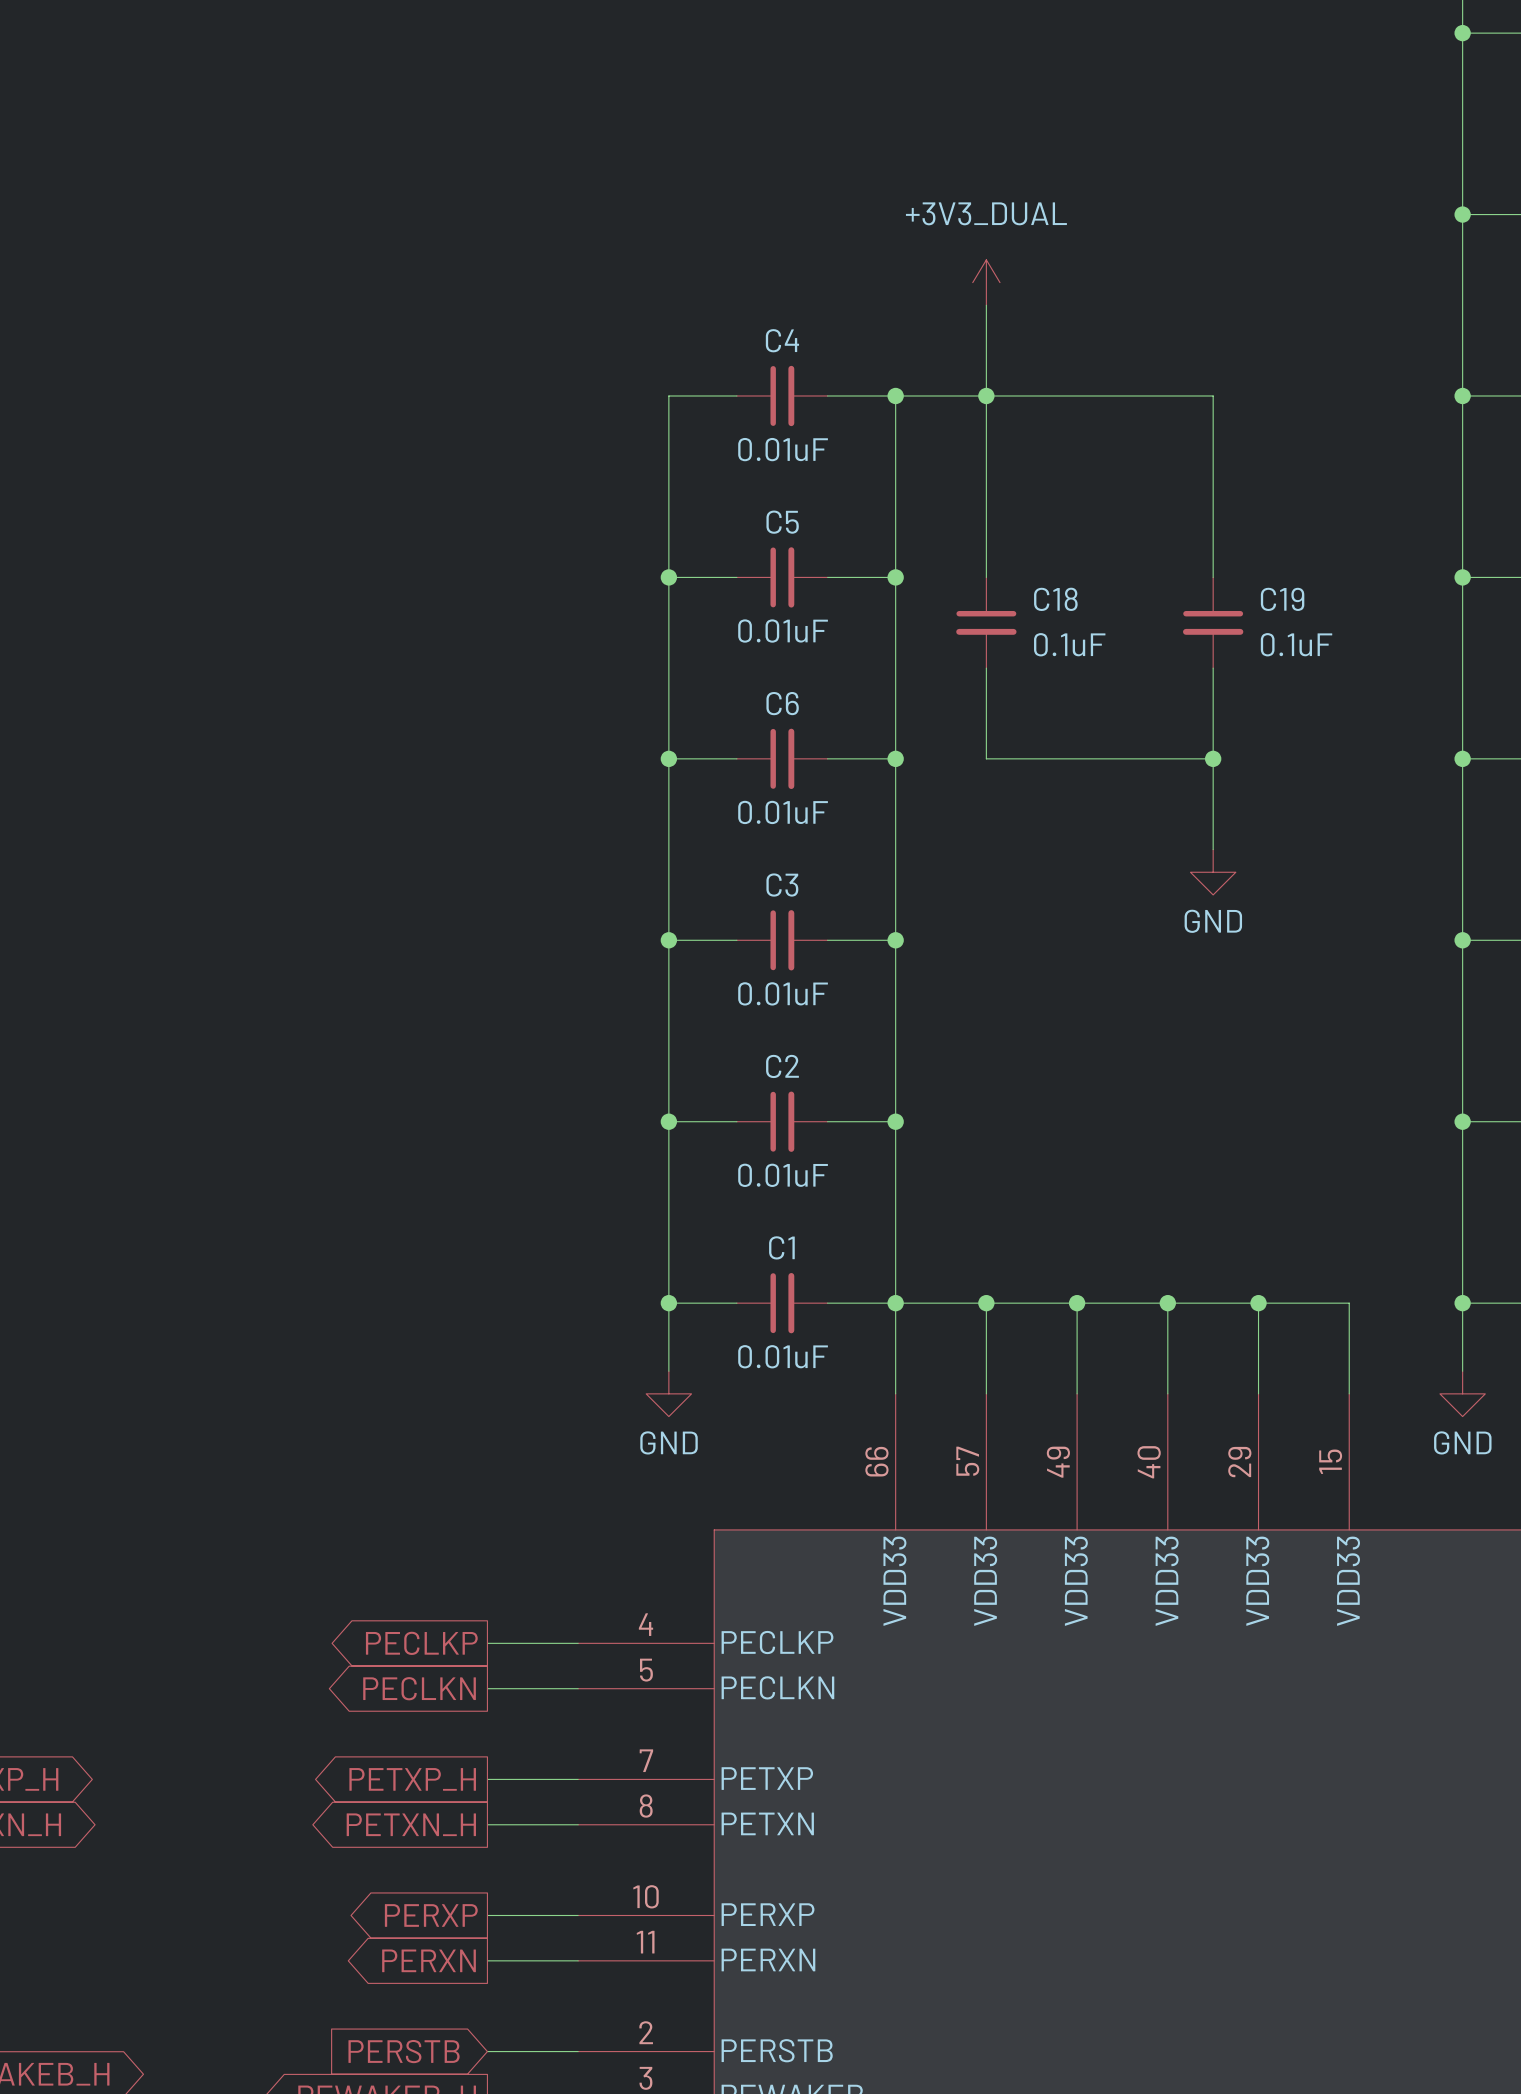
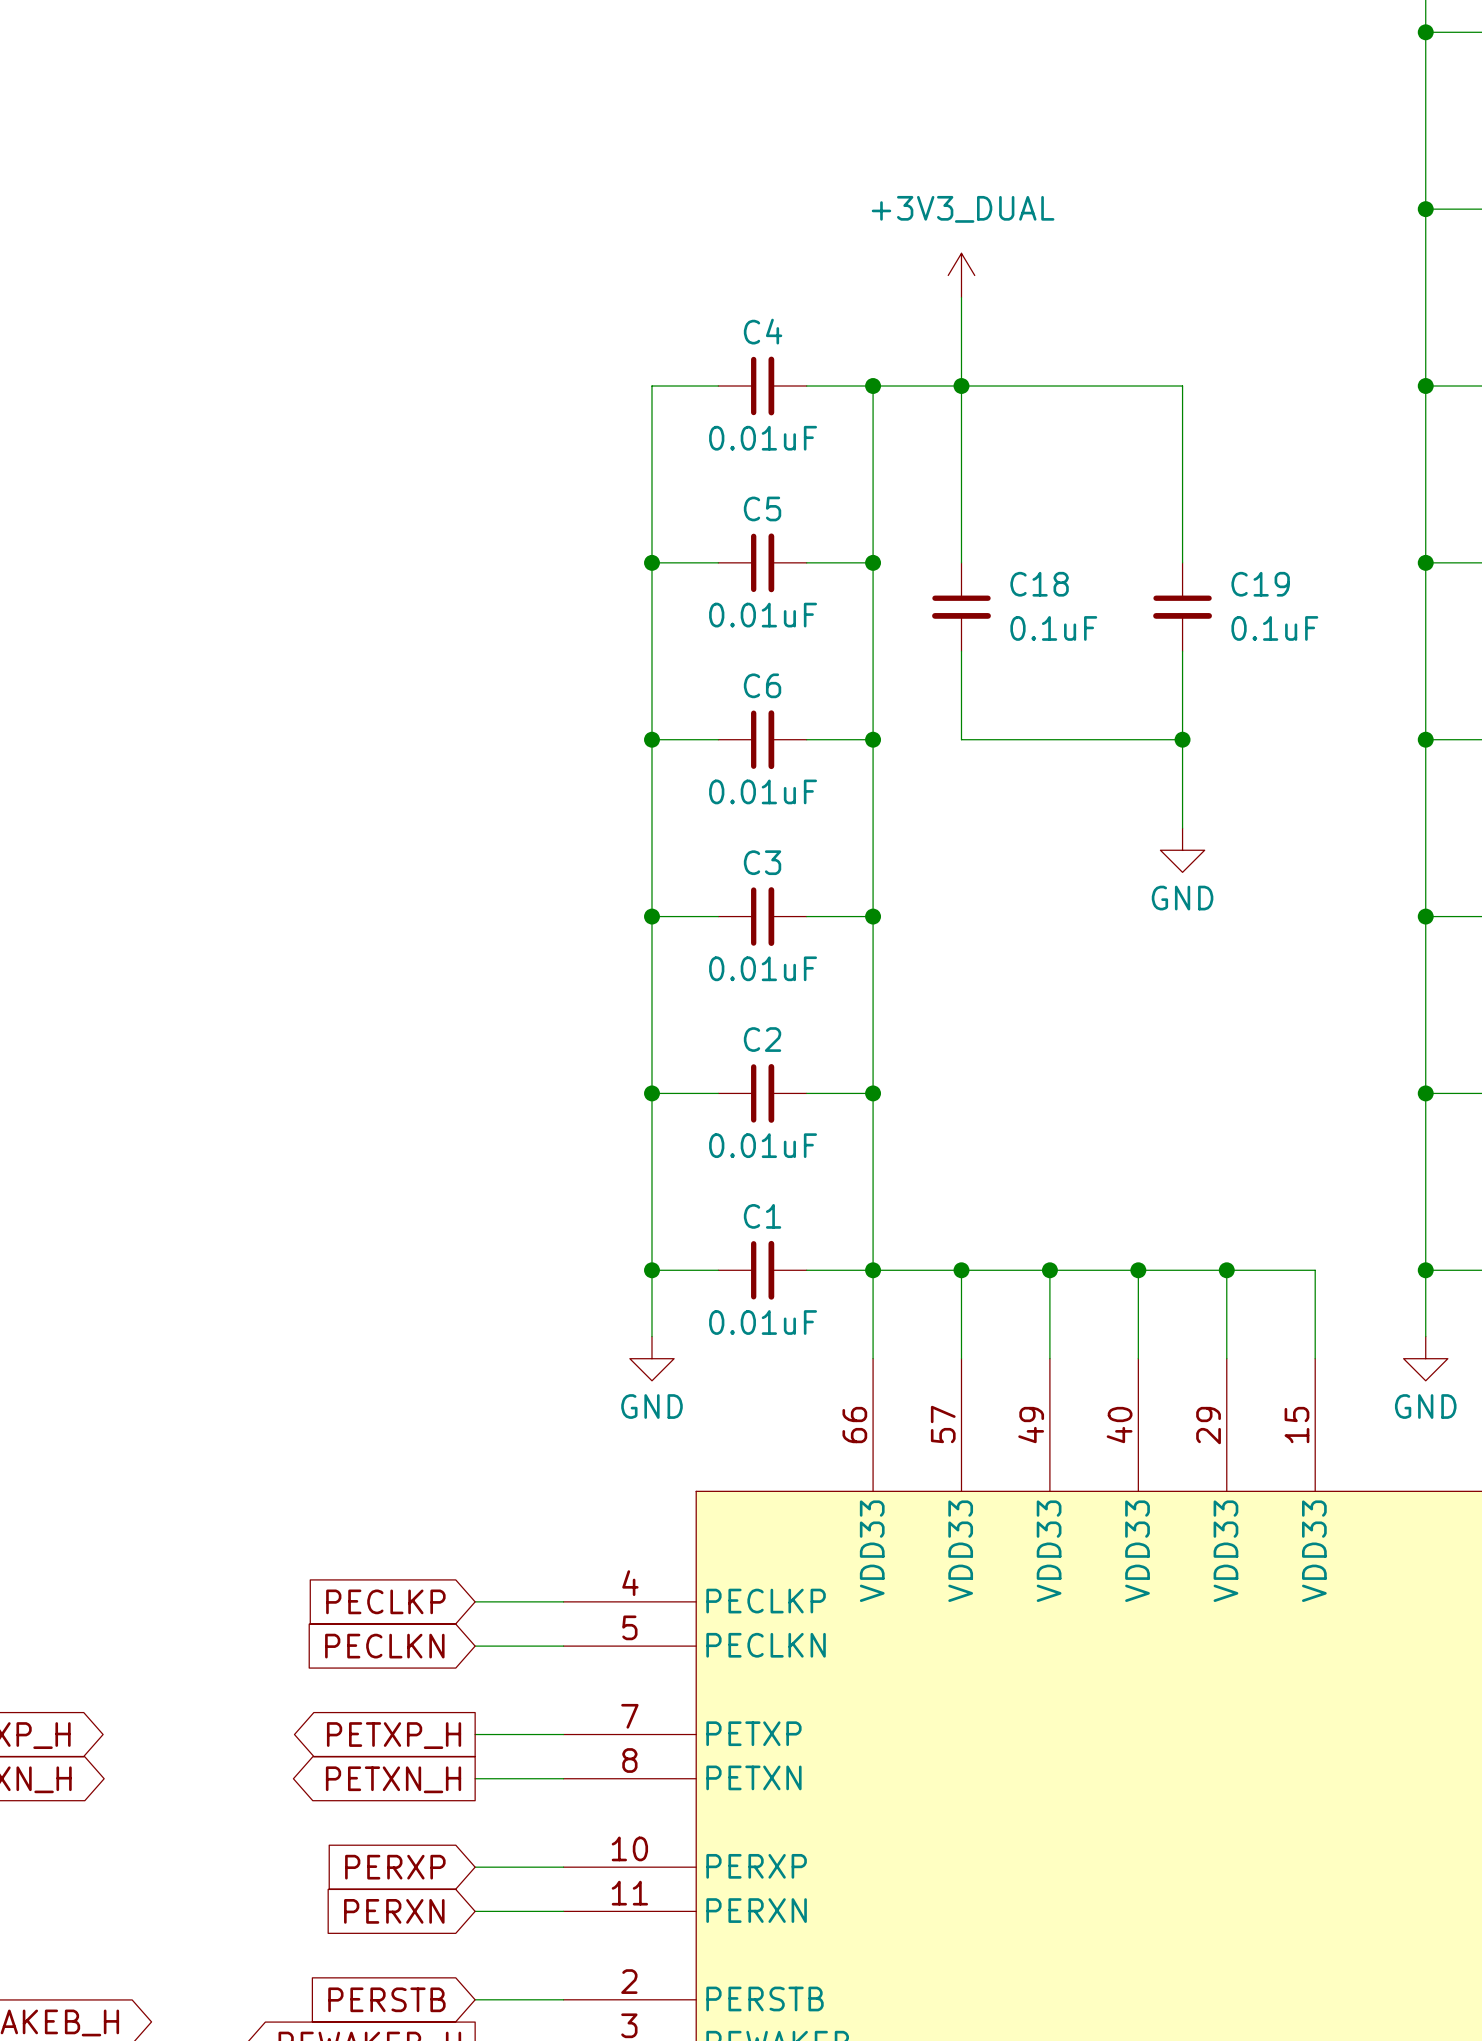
global label shape: output (421, 1643) -> input (385, 1601)
global label shape: output (419, 1688) -> input (384, 1646)
global label shape: output (431, 1915) -> input (395, 1867)
global label shape: output (429, 1960) -> input (394, 1911)

